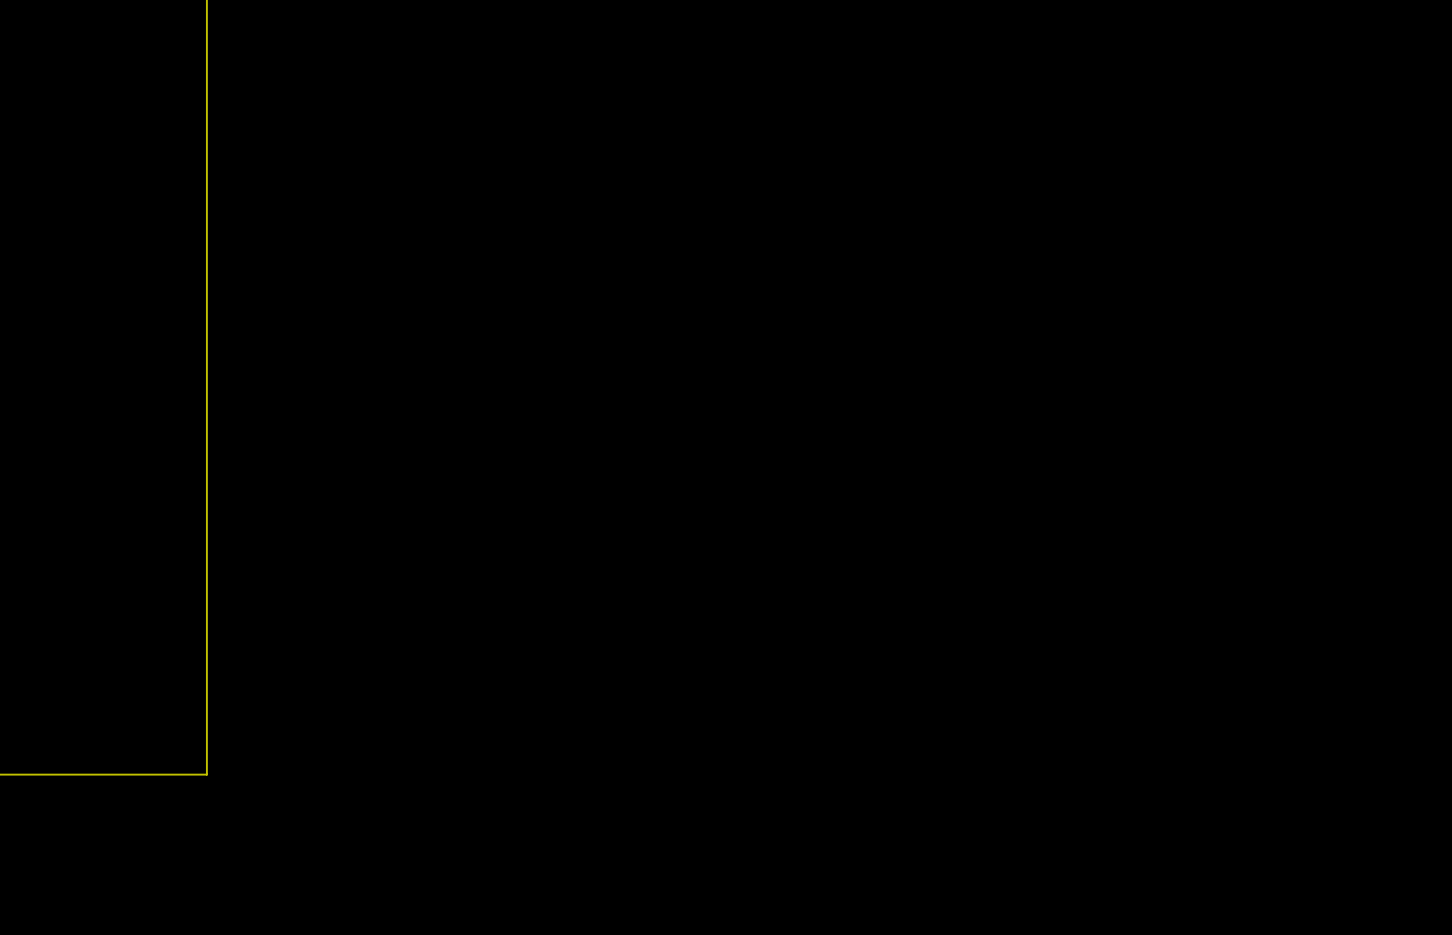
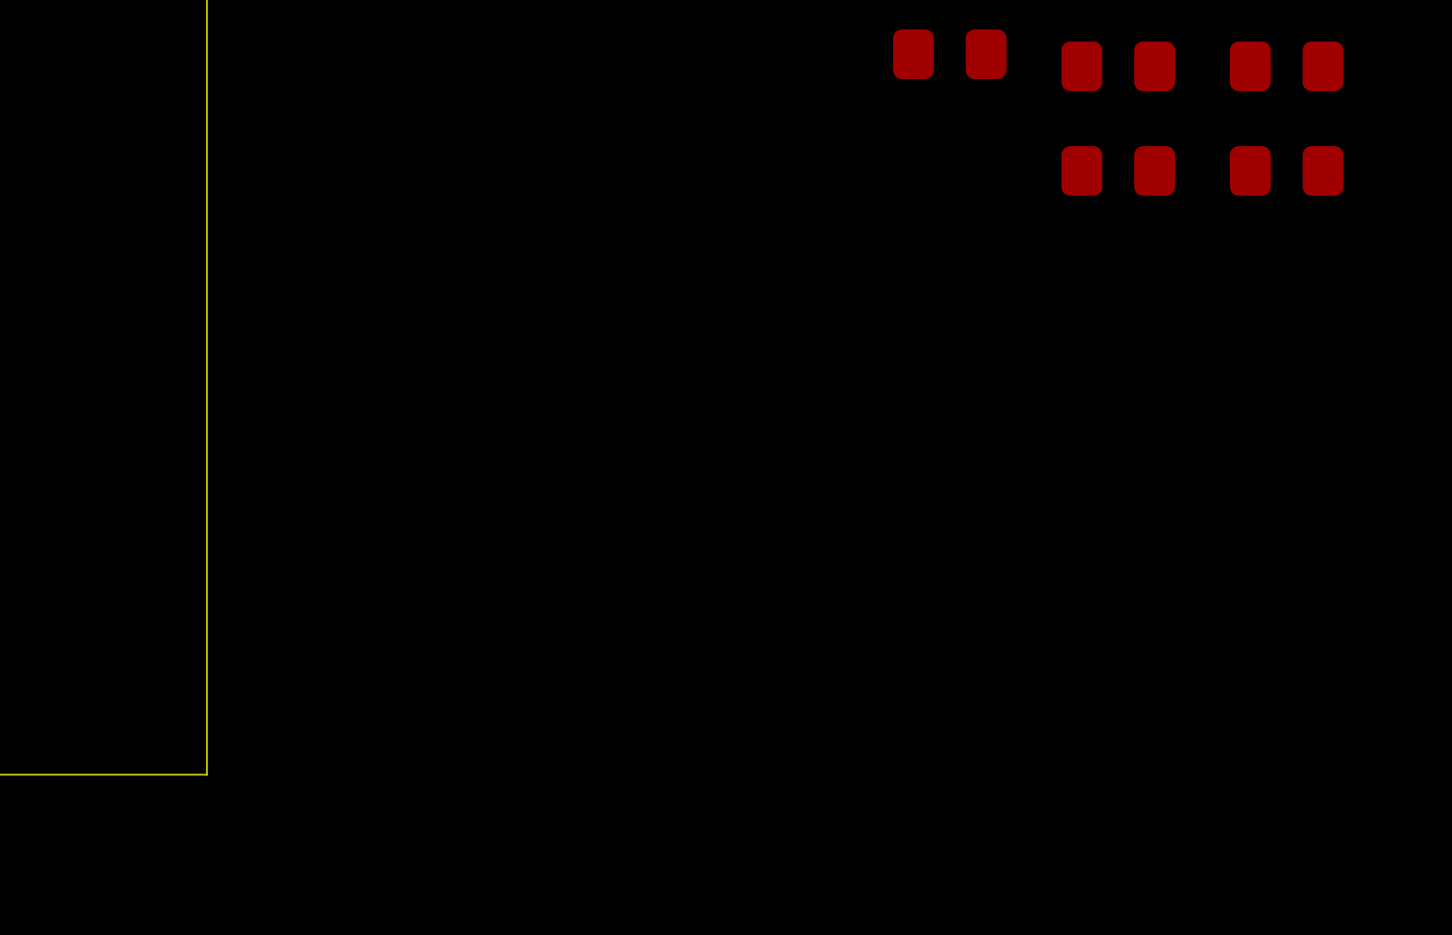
part: none -> (949, 54)
part: none -> (1118, 66)
part: none -> (1286, 66)
part: none -> (1118, 170)
part: none -> (1286, 170)

